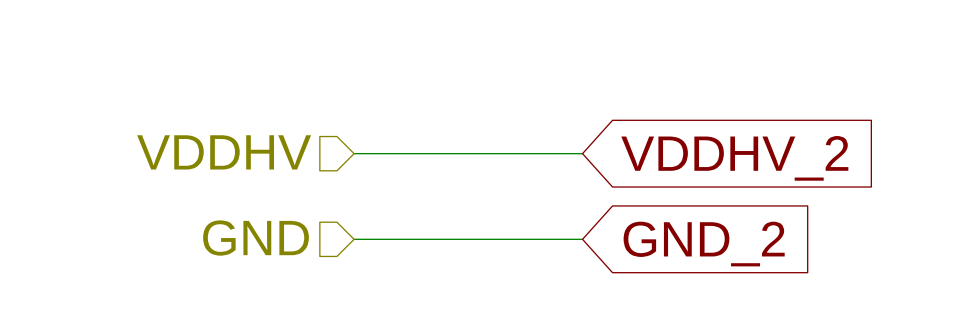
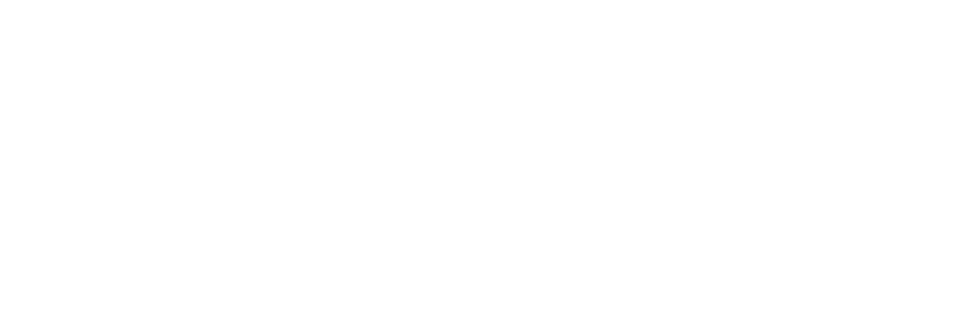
hierarchical label: VDDHV (224, 152) -> none
wire: (354, 153) (582, 153) -> none
global label: VDDHV_2 (734, 158) -> none
hierarchical label: GND (256, 238) -> none
wire: (354, 239) (582, 239) -> none
global label: GND_2 (704, 244) -> none

